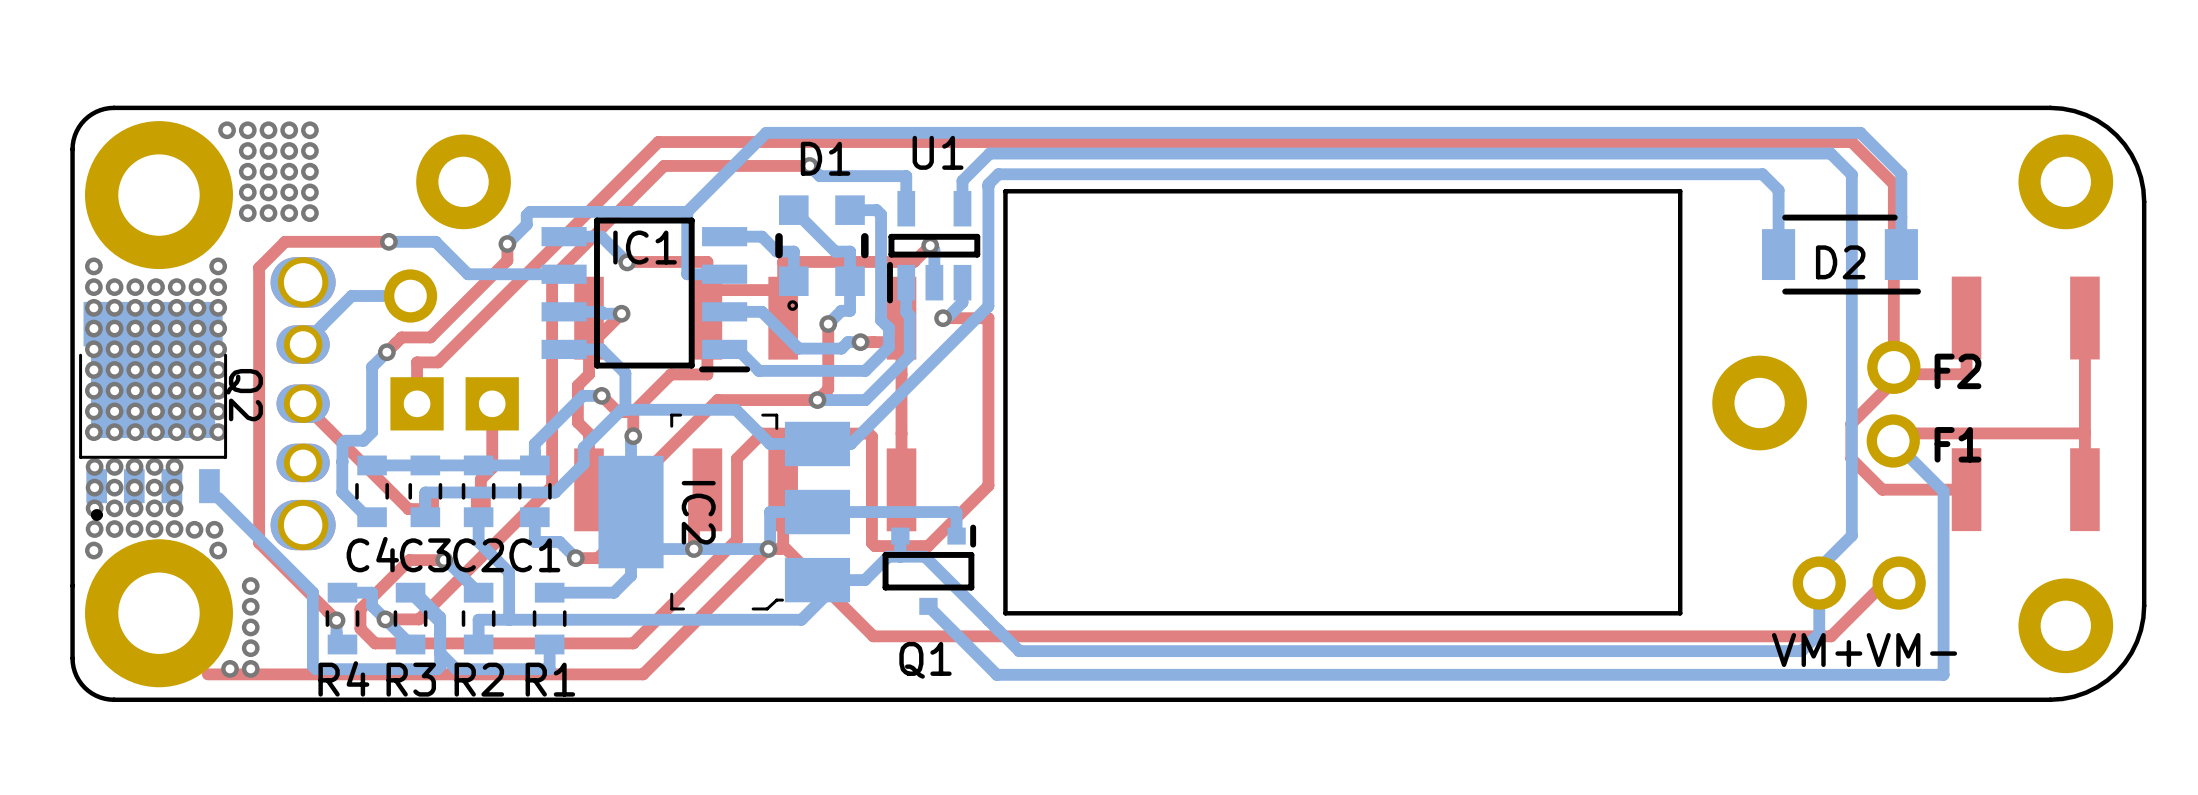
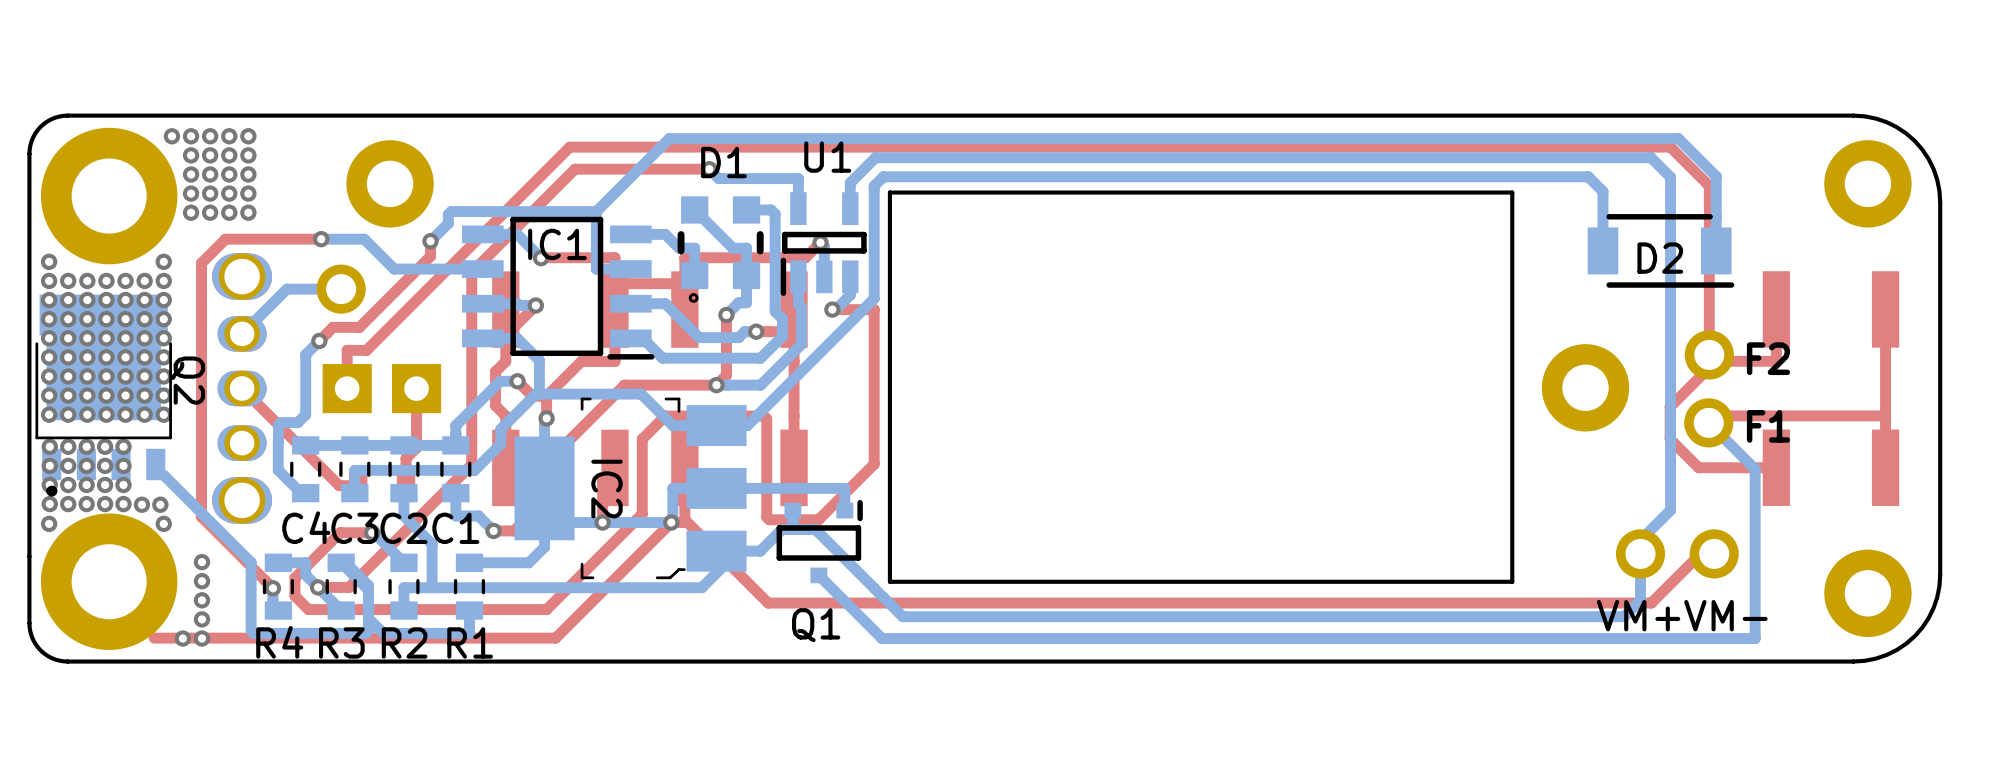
via: (250, 586) -> none
via: none -> (201, 562)
via: (250, 606) -> none
via: none -> (201, 581)
via: (250, 627) -> none
via: none -> (201, 600)
via: (250, 648) -> none
via: none -> (201, 619)
via: (230, 668) -> none
via: (250, 668) -> none
via: none -> (182, 638)
via: none -> (201, 638)

